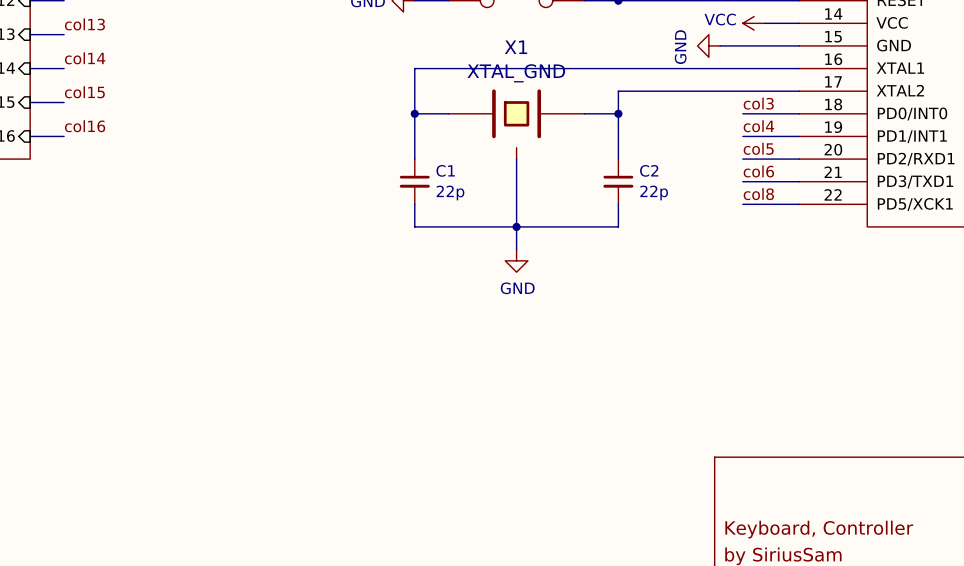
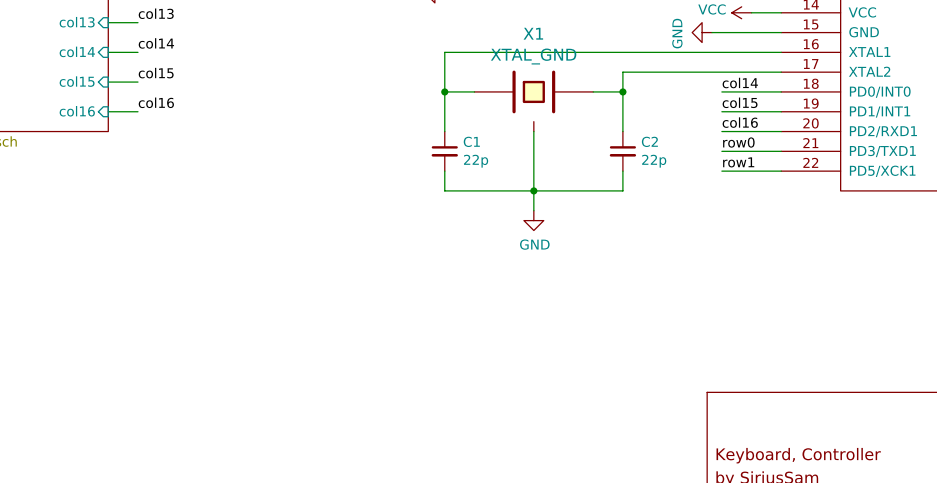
label: col3 (758, 103) -> col14 (740, 83)
wire: none -> (721, 91) (731, 91)
label: col4 (758, 126) -> col15 (740, 102)
wire: none -> (721, 111) (731, 111)
label: col5 (758, 148) -> col16 (740, 122)
wire: none -> (721, 131) (731, 131)
label: none -> row0 (738, 142)
label: col6 (758, 171) -> none
wire: none -> (721, 151) (731, 151)
label: none -> row1 (738, 162)
label: col8 (758, 194) -> none
wire: none -> (721, 171) (731, 171)

